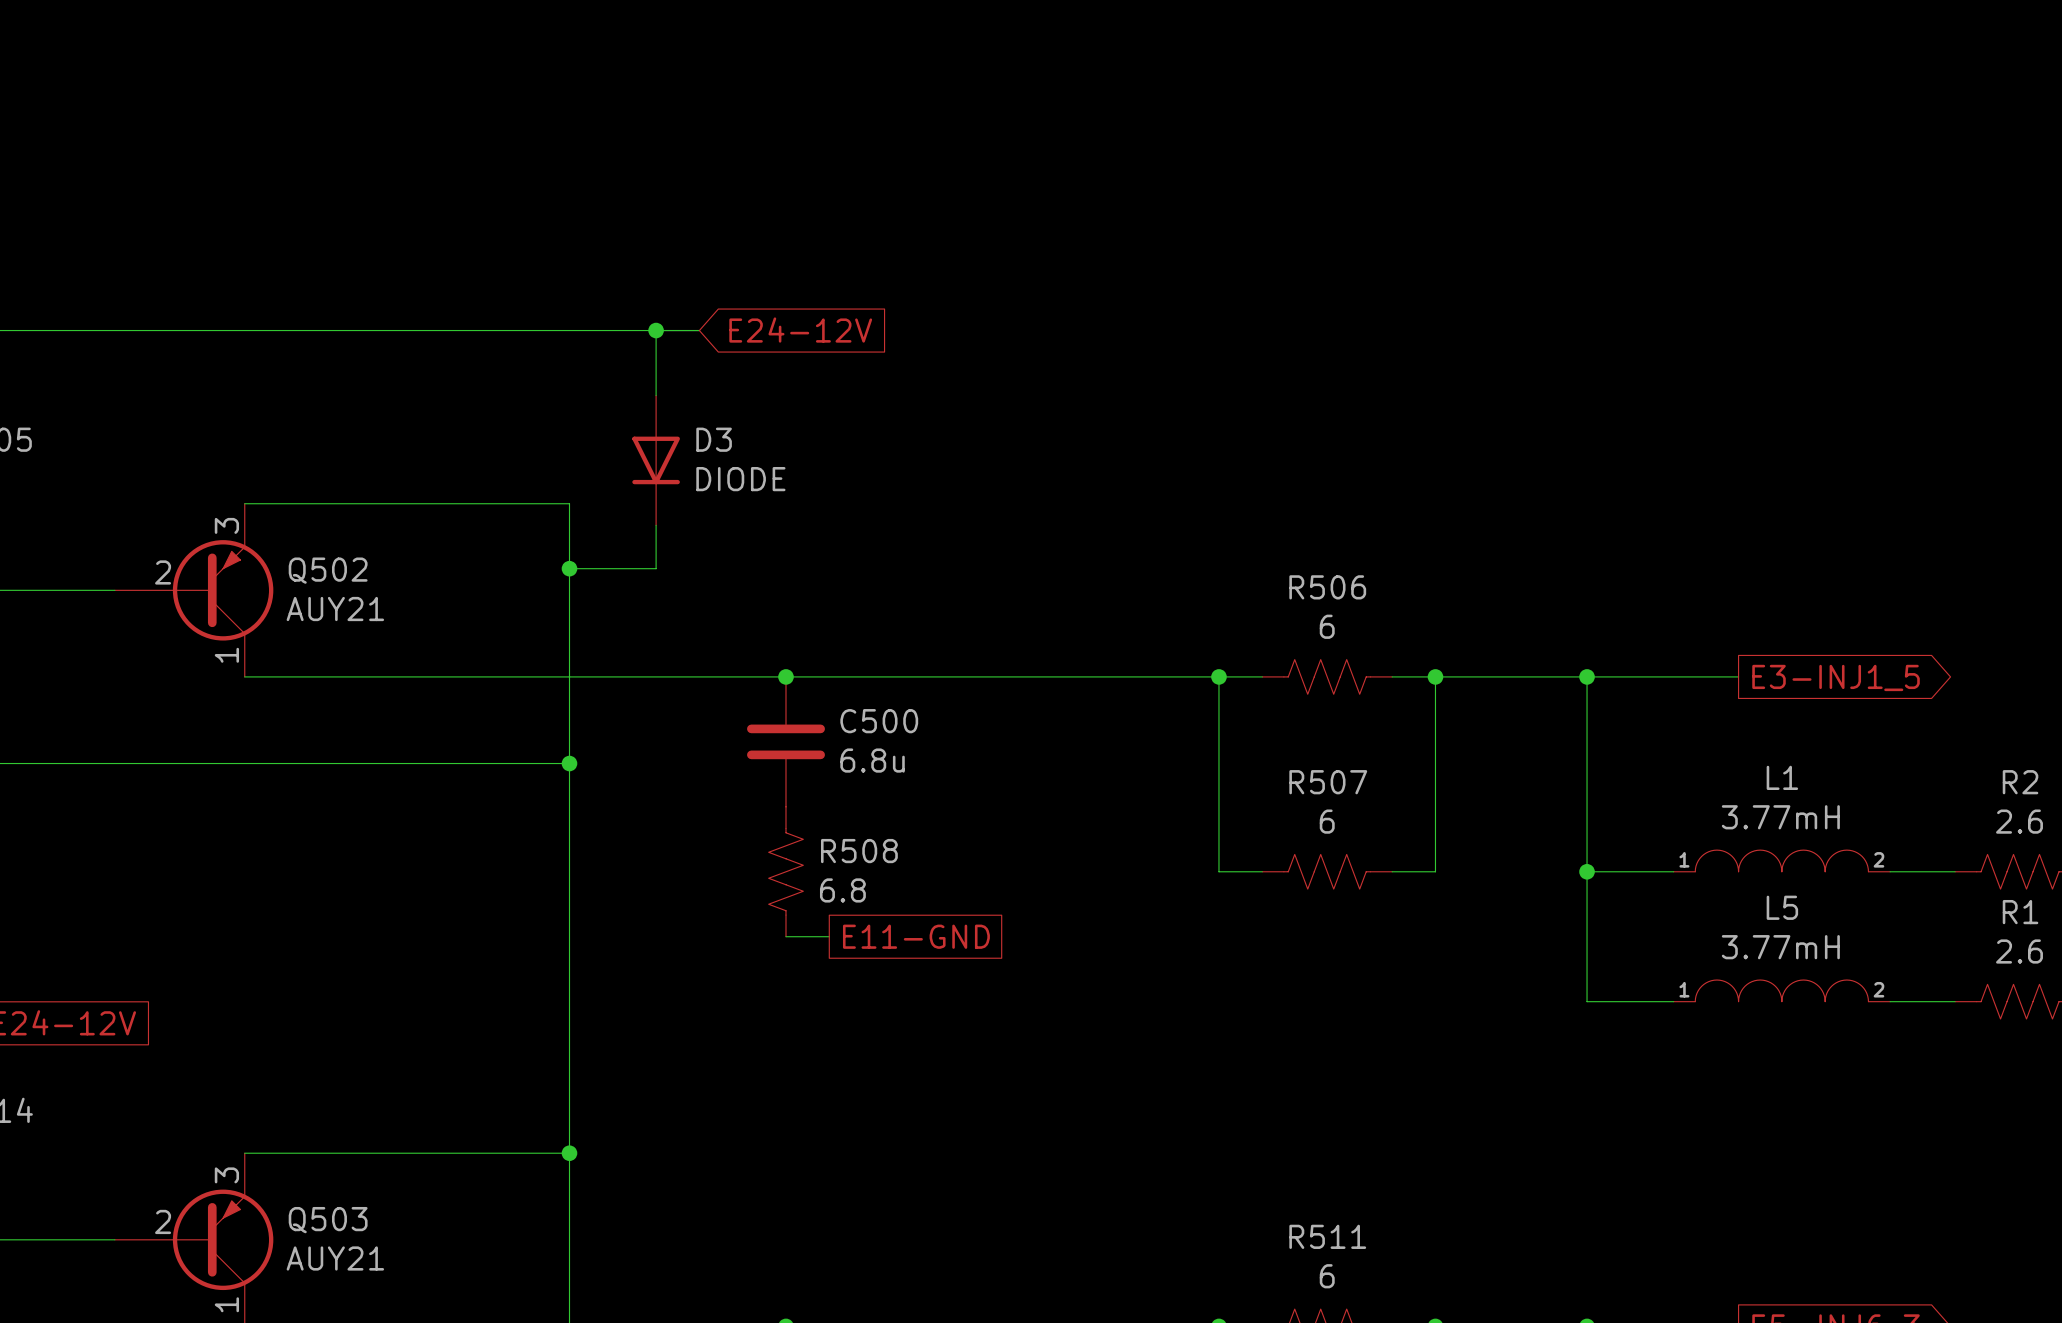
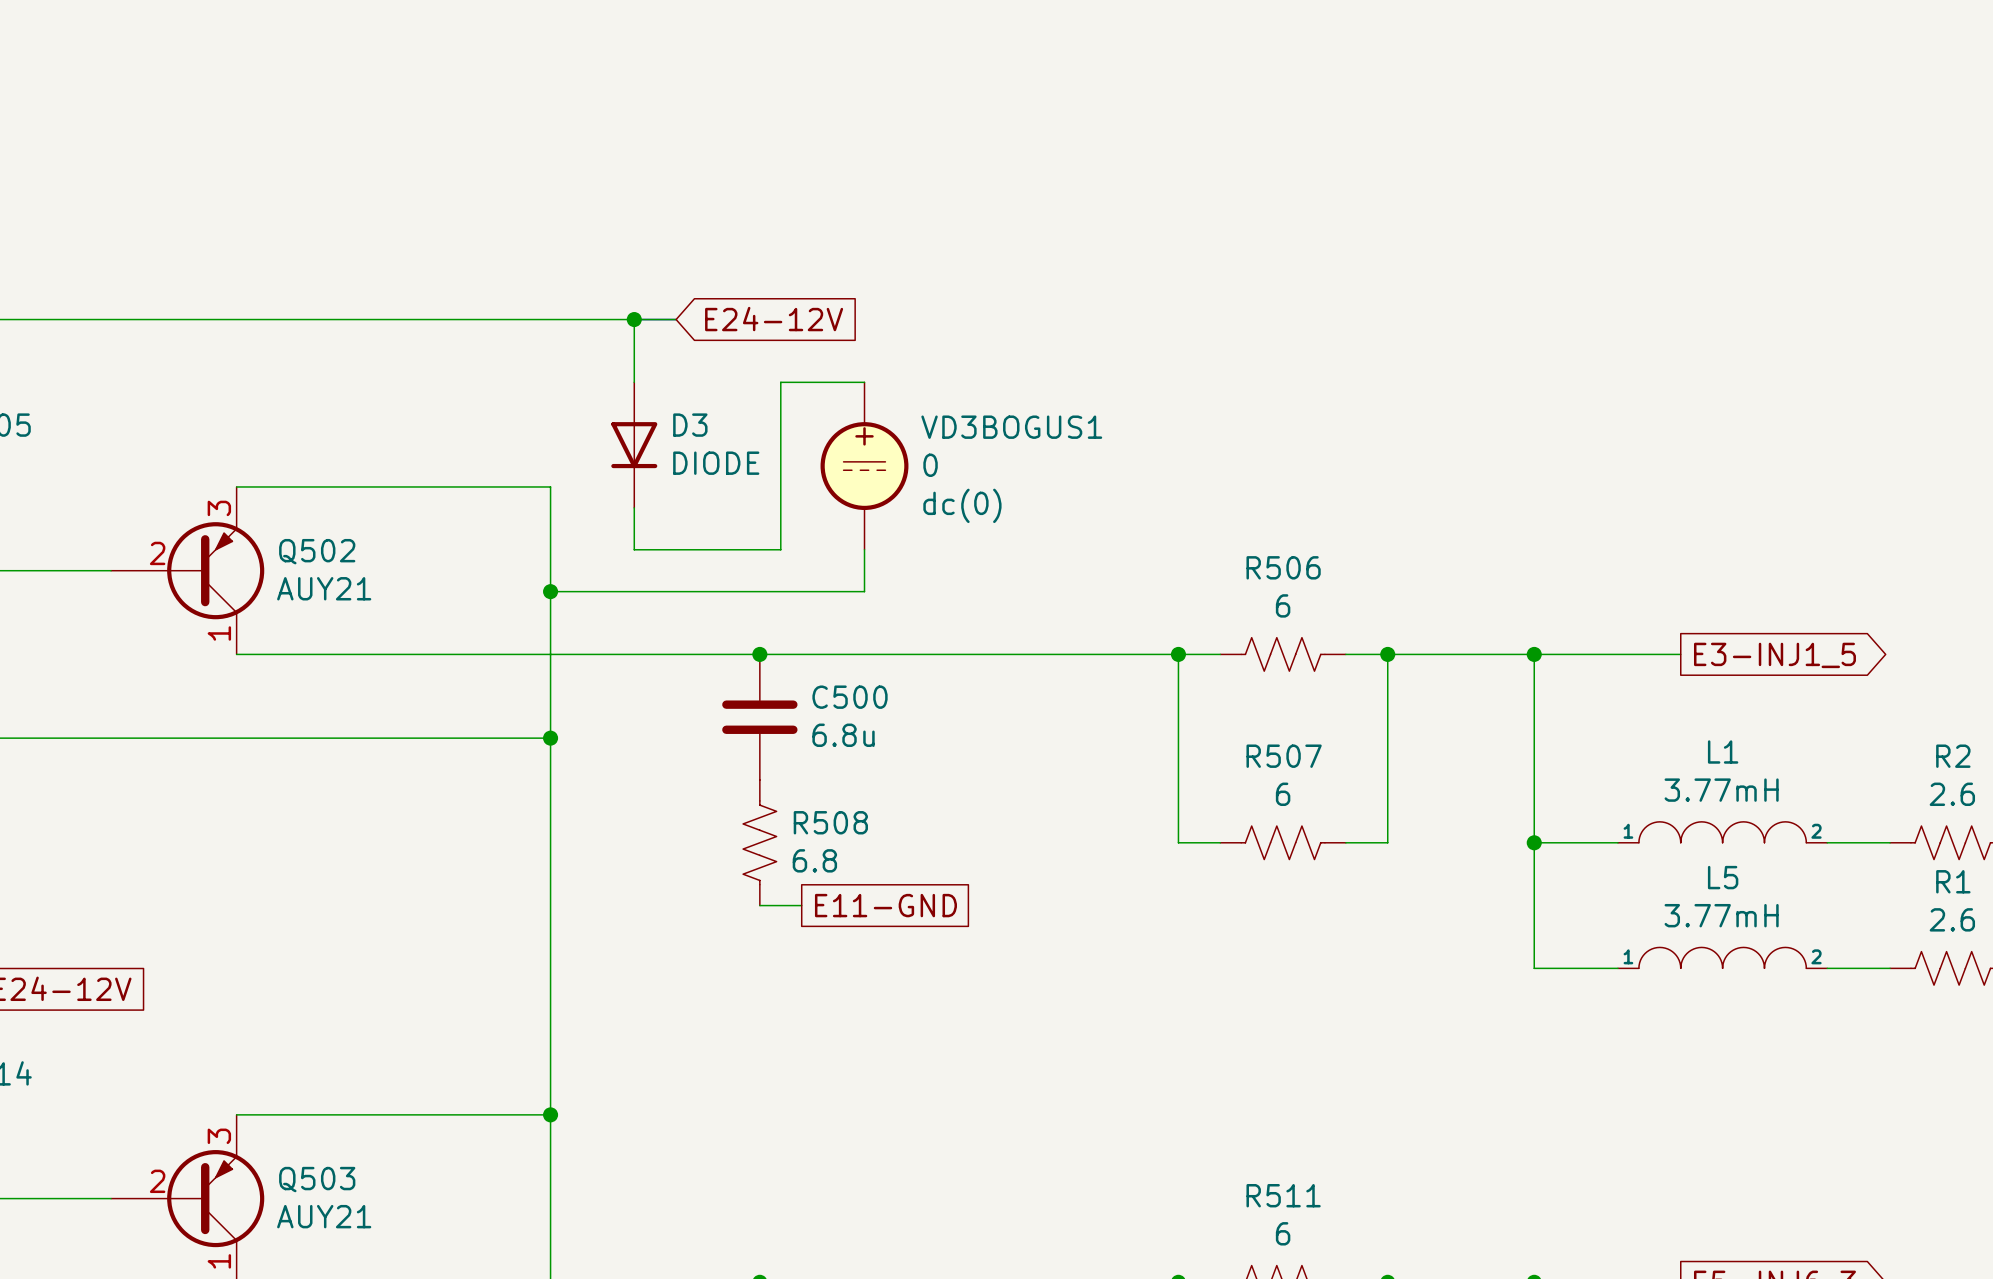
VD3BOGUS1: none -> 0 (864, 466)
wire: (569, 568) (656, 568) -> (864, 382) (780, 382) (780, 549) (634, 549)
junction position: (569, 568) -> (550, 591)
wire: none -> (864, 549) (864, 591) (550, 591)

